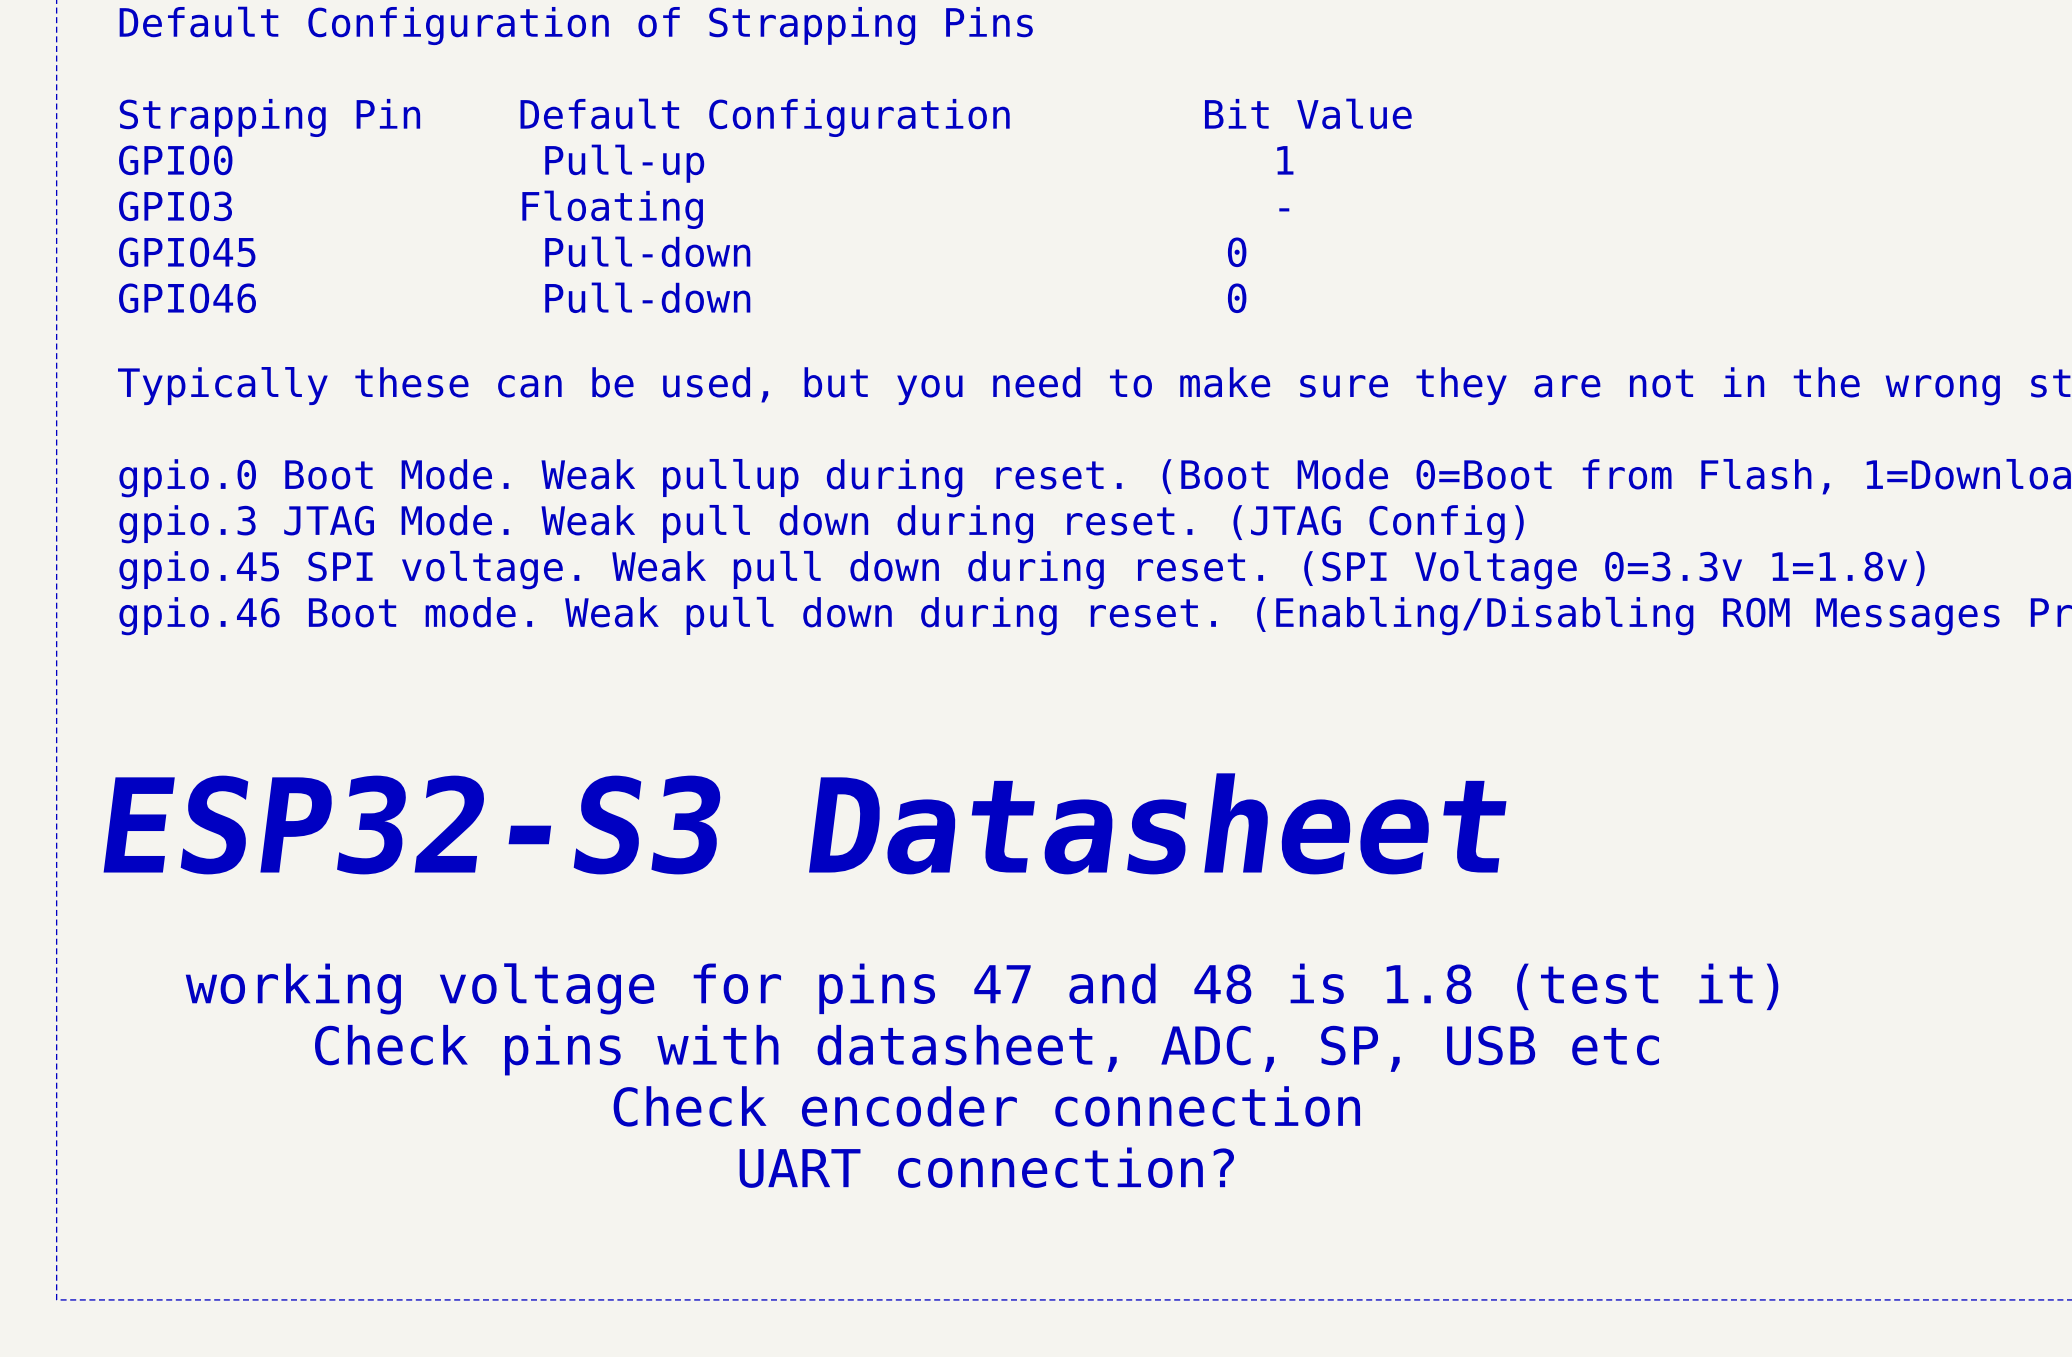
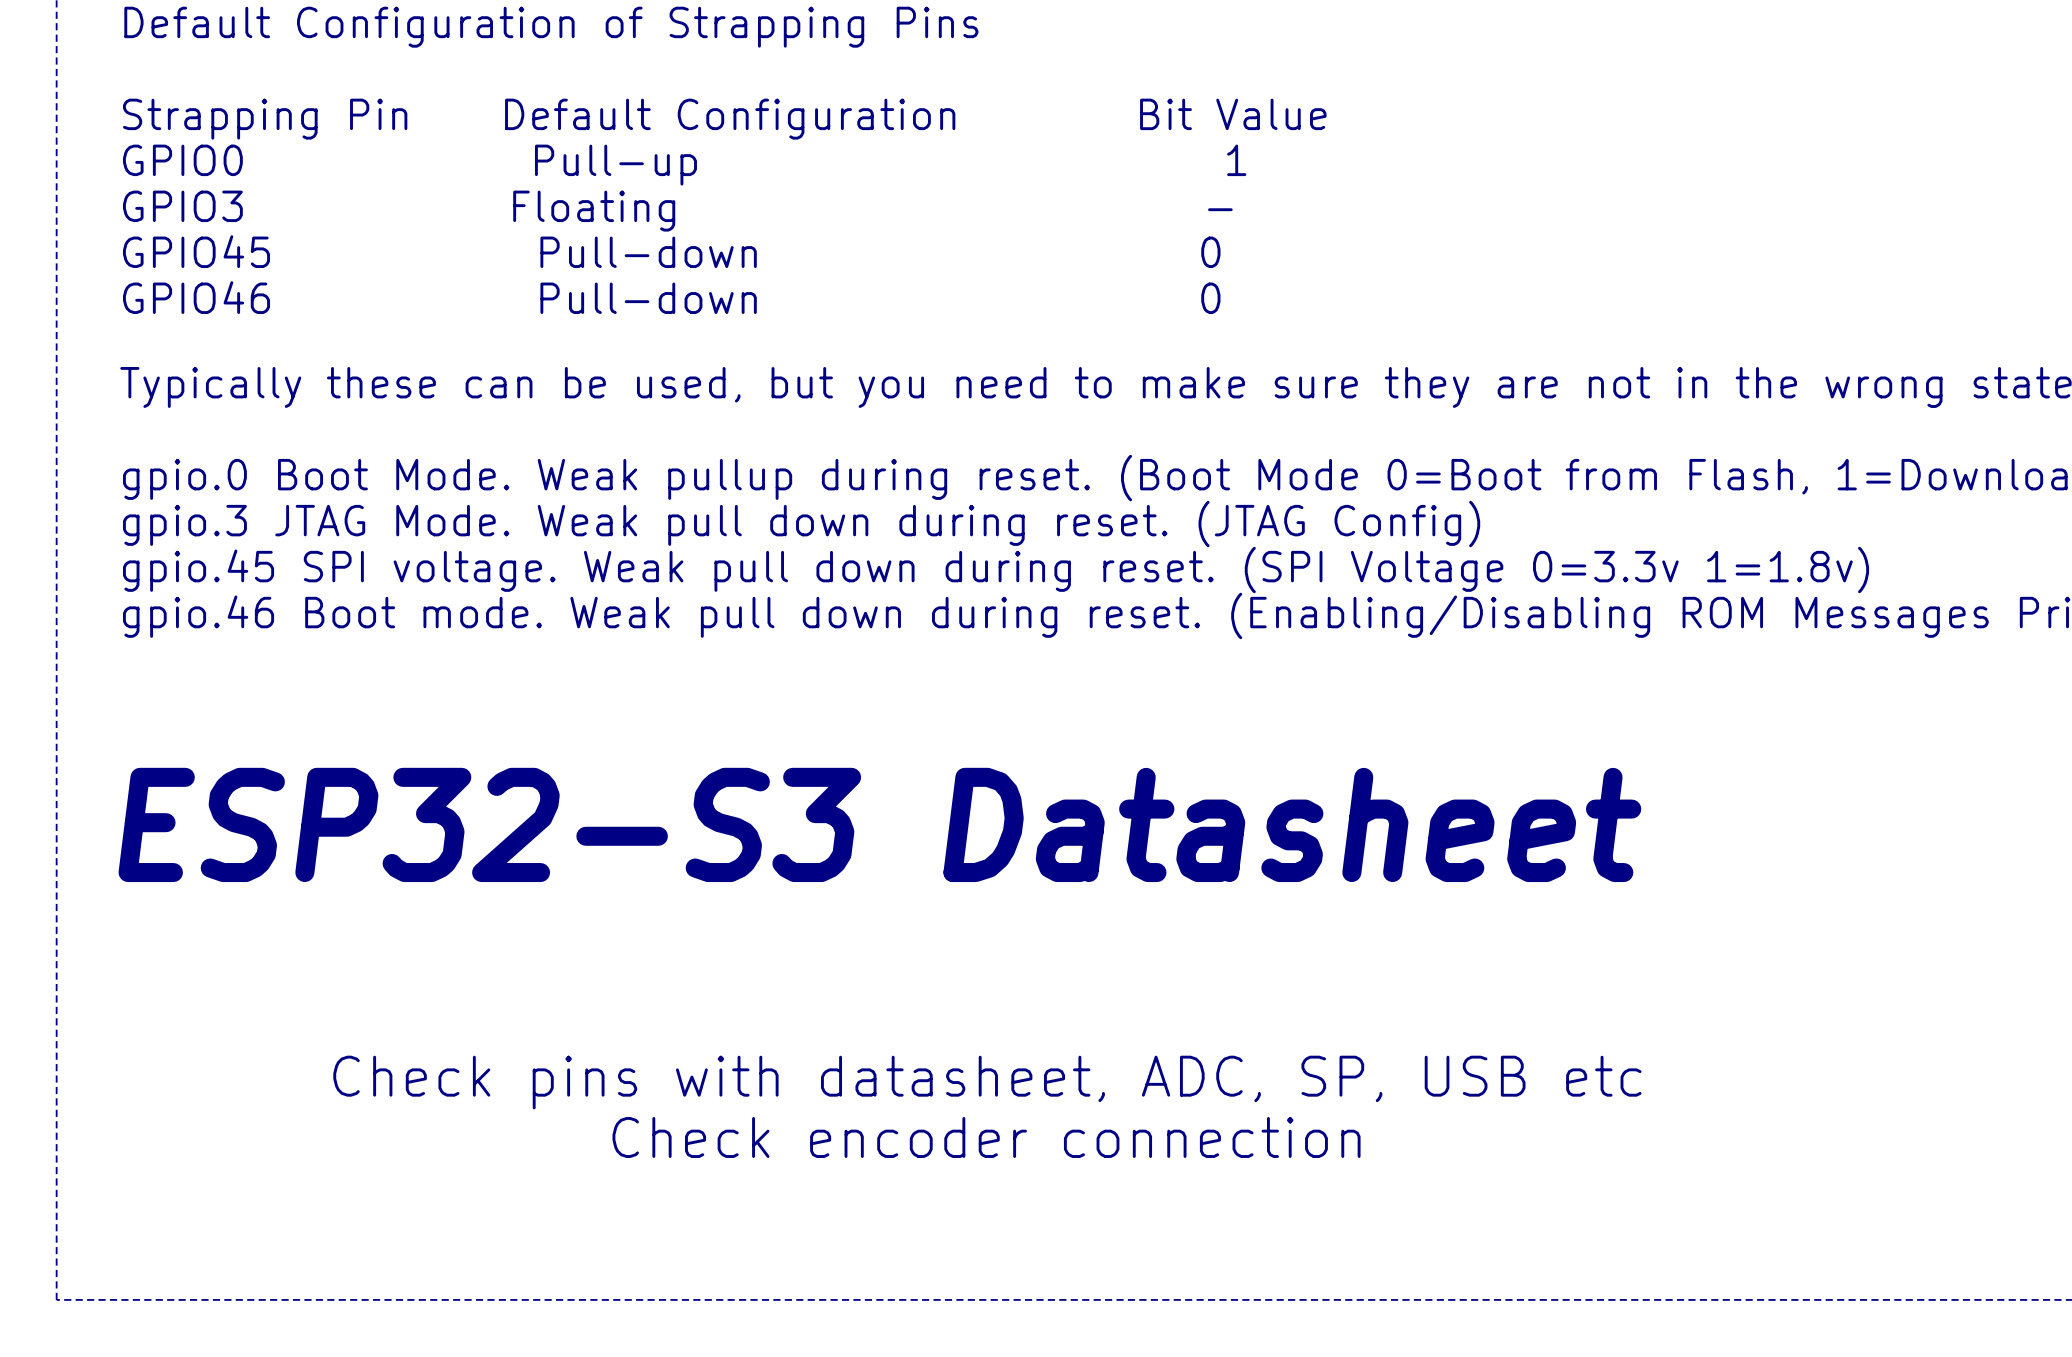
text: working voltage for pins 47 and 48 is 1.8 (test it) (981, 988) -> none
text position: Check pins with datasheet, ADC, SP, USB etc (987, 1050) -> Check pins with datasheet, ADC, SP, USB etc (987, 1082)
text position: Check encoder connection (986, 1106) -> Check encoder connection (986, 1137)
text: UART connection? (986, 1167) -> none

